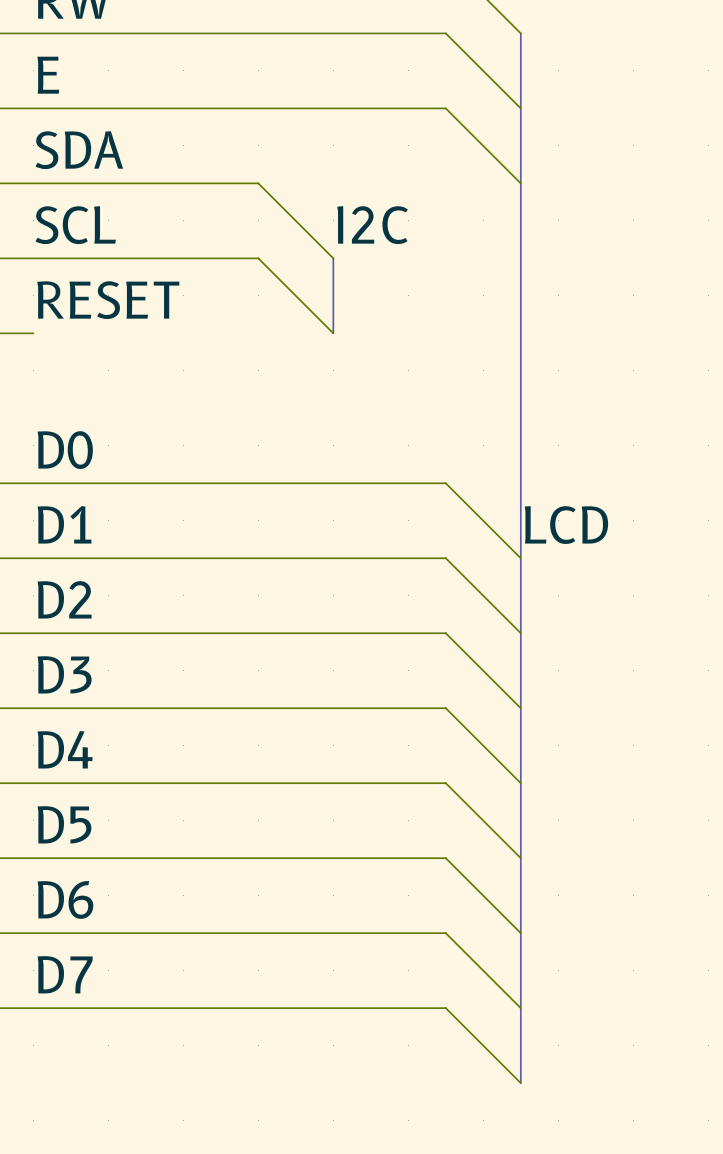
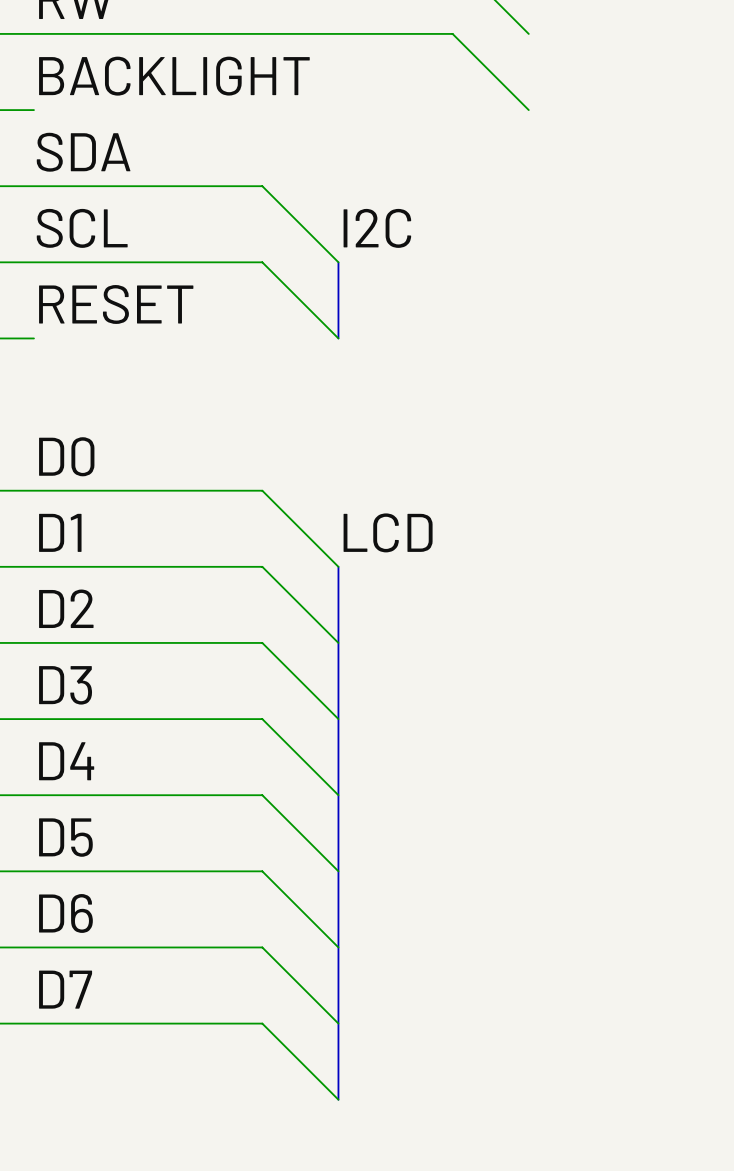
bus: (520, 33) (520, 1083) -> none
label: E (48, 75) -> BACKLIGHT (174, 76)
wire: (33, 108) (445, 108) (520, 183) -> none
wire: (258, 483) (445, 483) (520, 558) -> (262, 490) (338, 566)
label position: LCD (566, 525) -> LCD (388, 532)
wire: (258, 558) (445, 558) (520, 633) -> (262, 566) (338, 642)
bus: none -> (338, 566) (338, 1099)
wire: (258, 633) (445, 633) (520, 708) -> (262, 642) (338, 719)
wire: (258, 708) (445, 708) (520, 783) -> (262, 719) (338, 795)
wire: (258, 783) (445, 783) (520, 858) -> (262, 795) (338, 871)
wire: (258, 858) (445, 858) (520, 933) -> (262, 871) (338, 947)
wire: (258, 933) (445, 933) (520, 1008) -> (262, 947) (338, 1023)
wire: (258, 1008) (445, 1008) (520, 1083) -> (262, 1023) (338, 1099)

